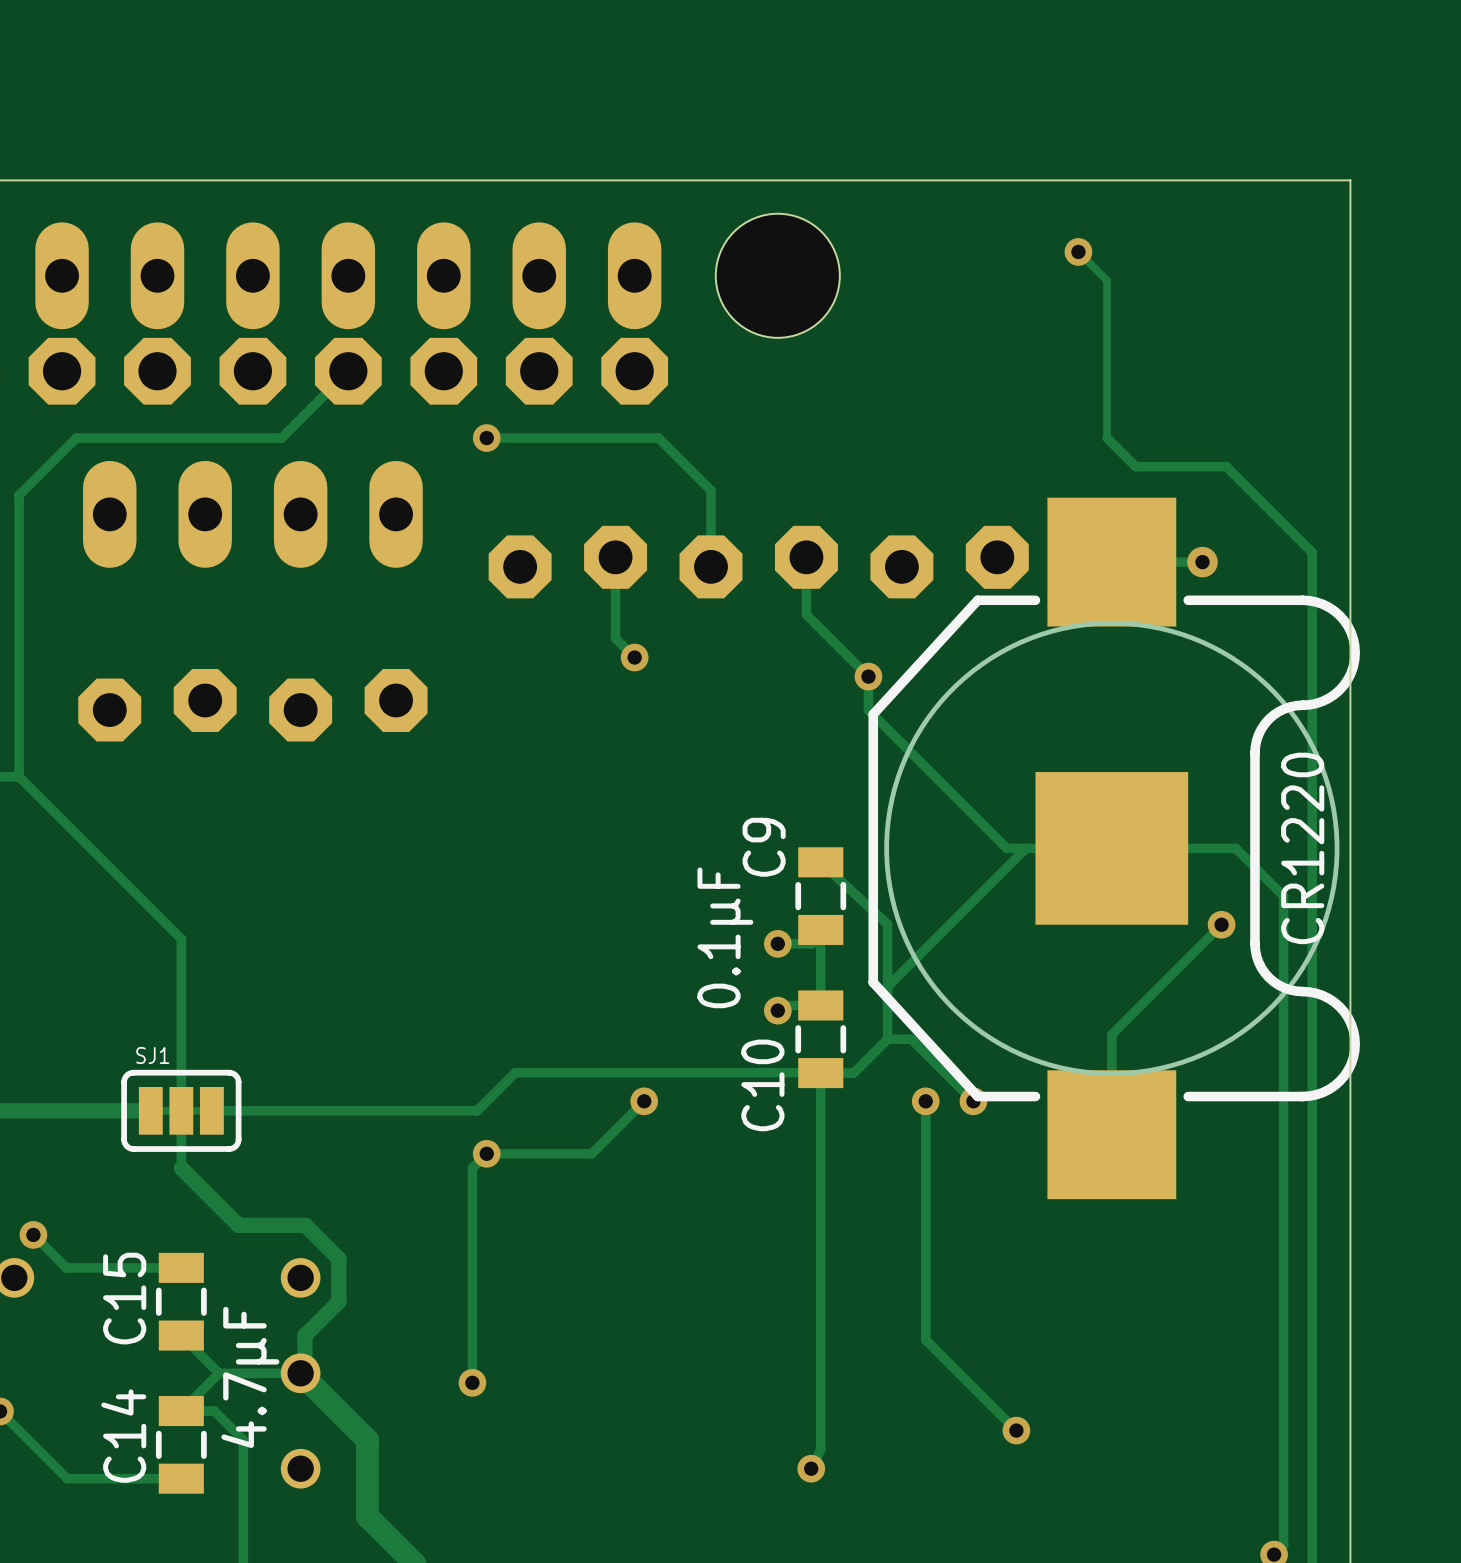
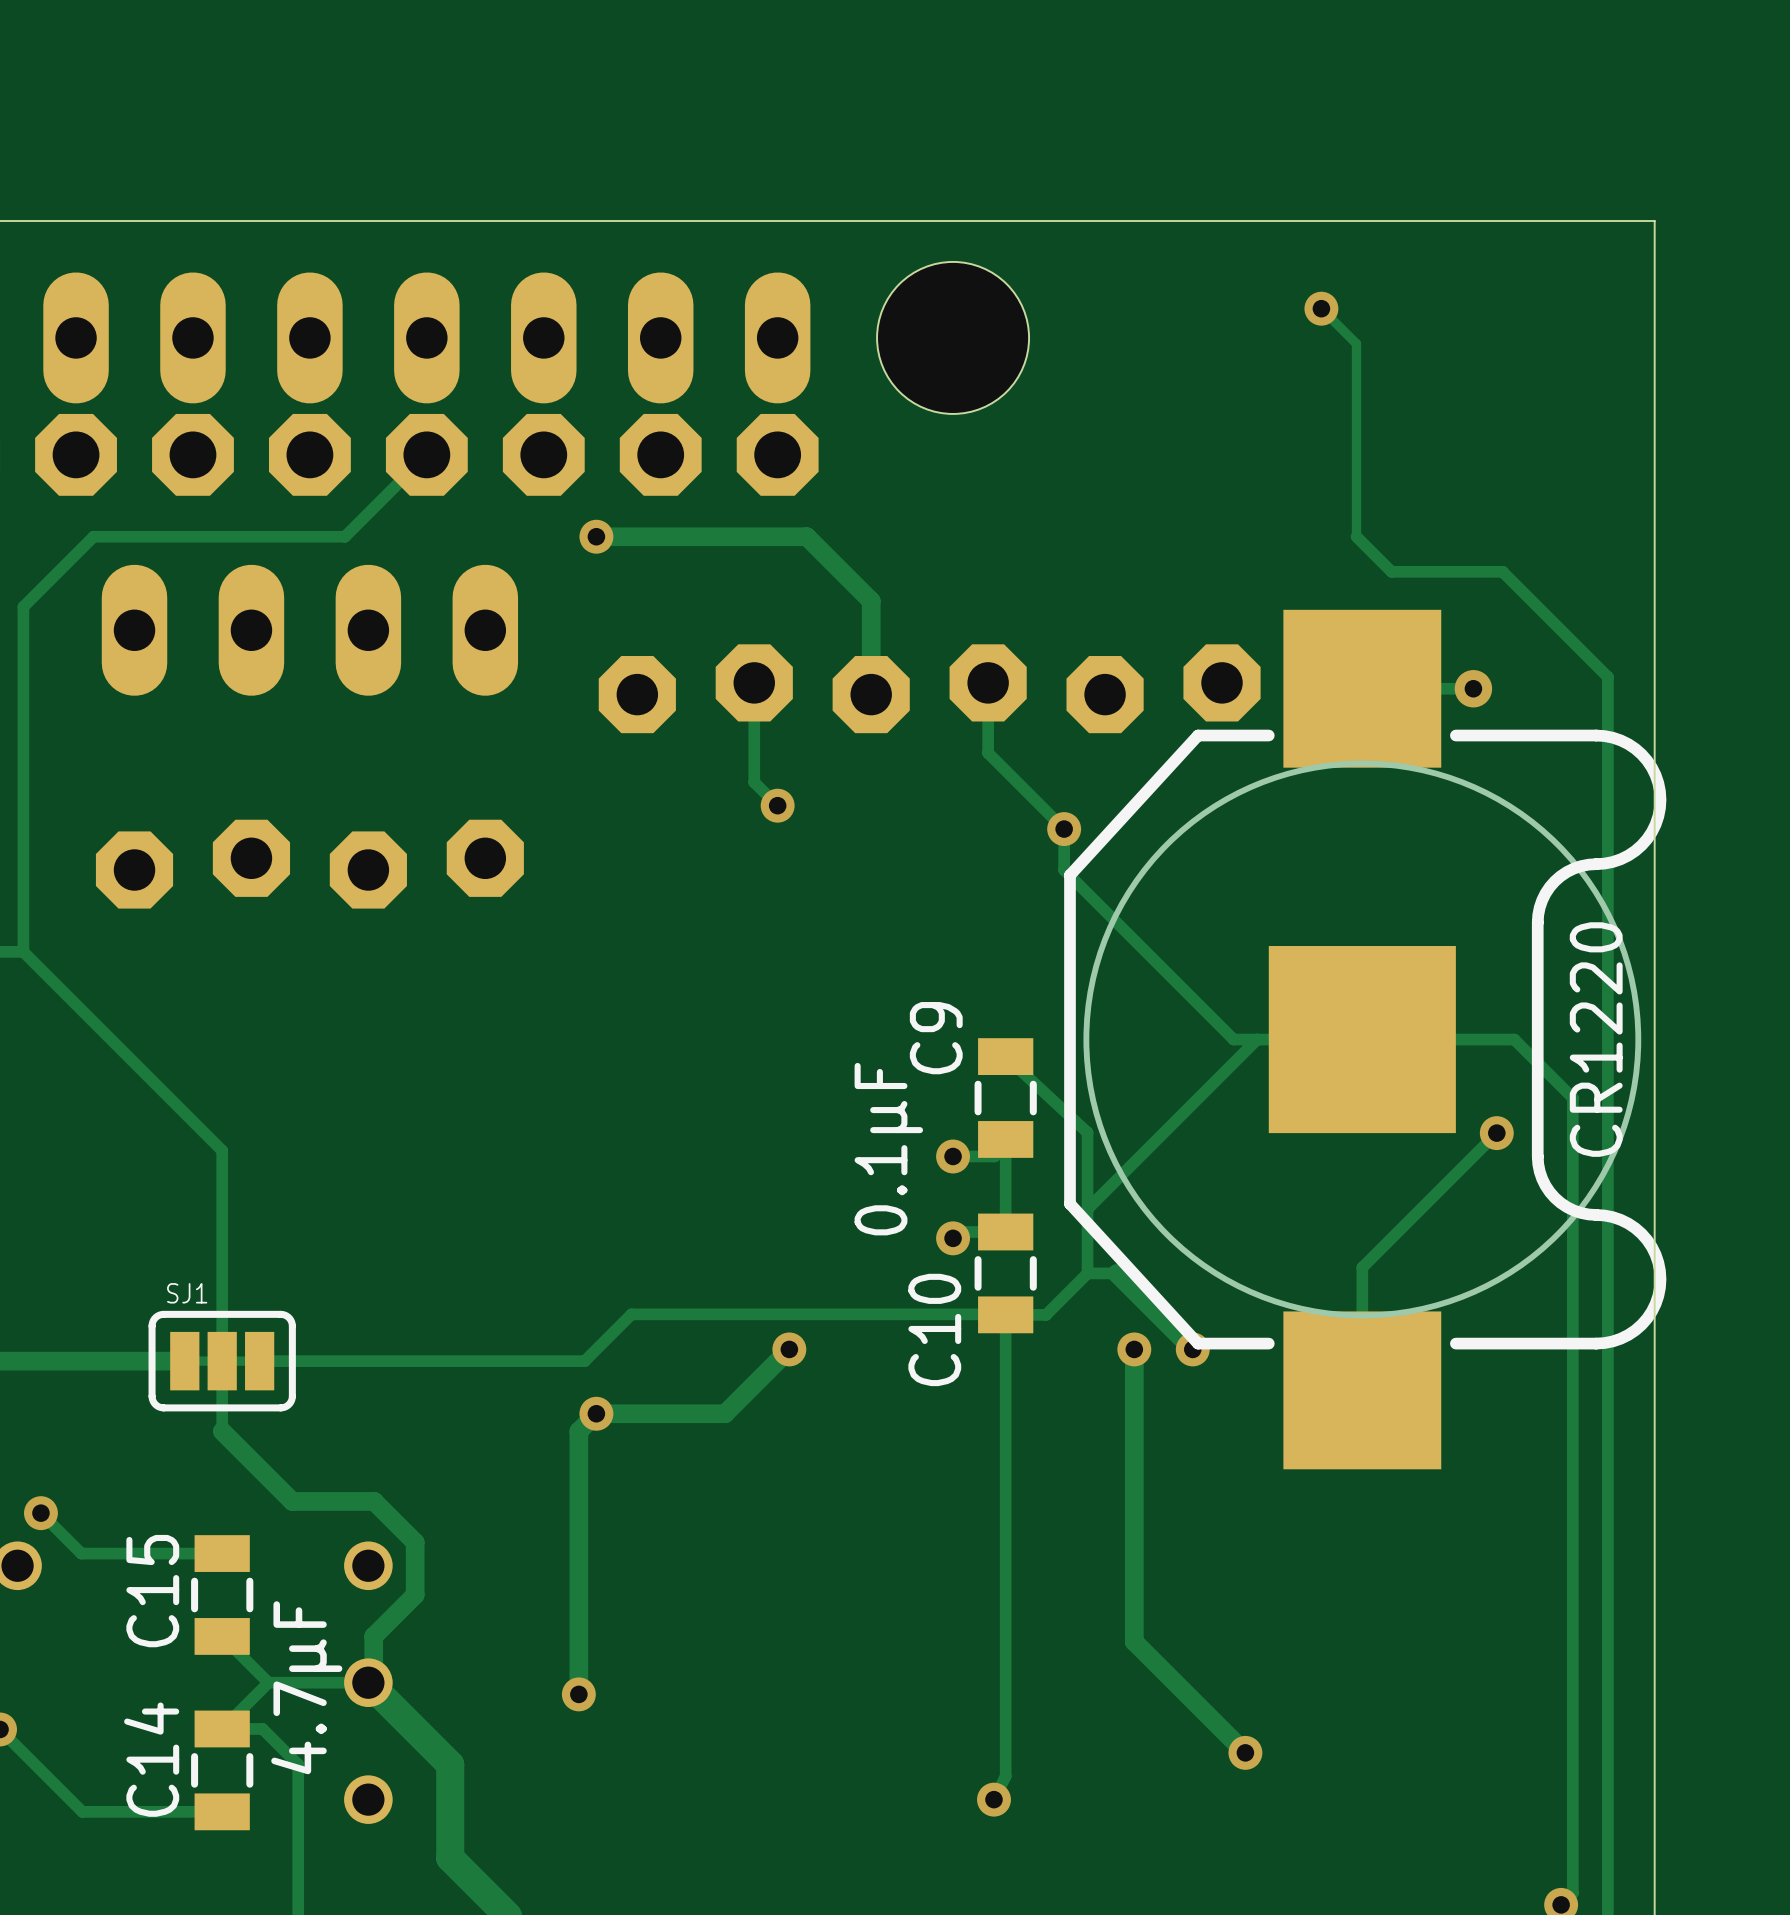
track width: thin (486, 438) (658, 438) (711, 490) (711, 566) -> thick (596, 536) (806, 536) (871, 601) (871, 694)
track width: thin (911, 1039) (973, 1101) -> thick (1116, 1273) (1192, 1349)
track width: thin (644, 1101) (591, 1153) (486, 1153) (472, 1168) (472, 1382) -> thick (789, 1349) (725, 1413) (596, 1413) (578, 1431) (578, 1694)
track width: thin (925, 1101) (925, 1339) (1016, 1430) -> thick (1134, 1349) (1134, 1641) (1245, 1752)

